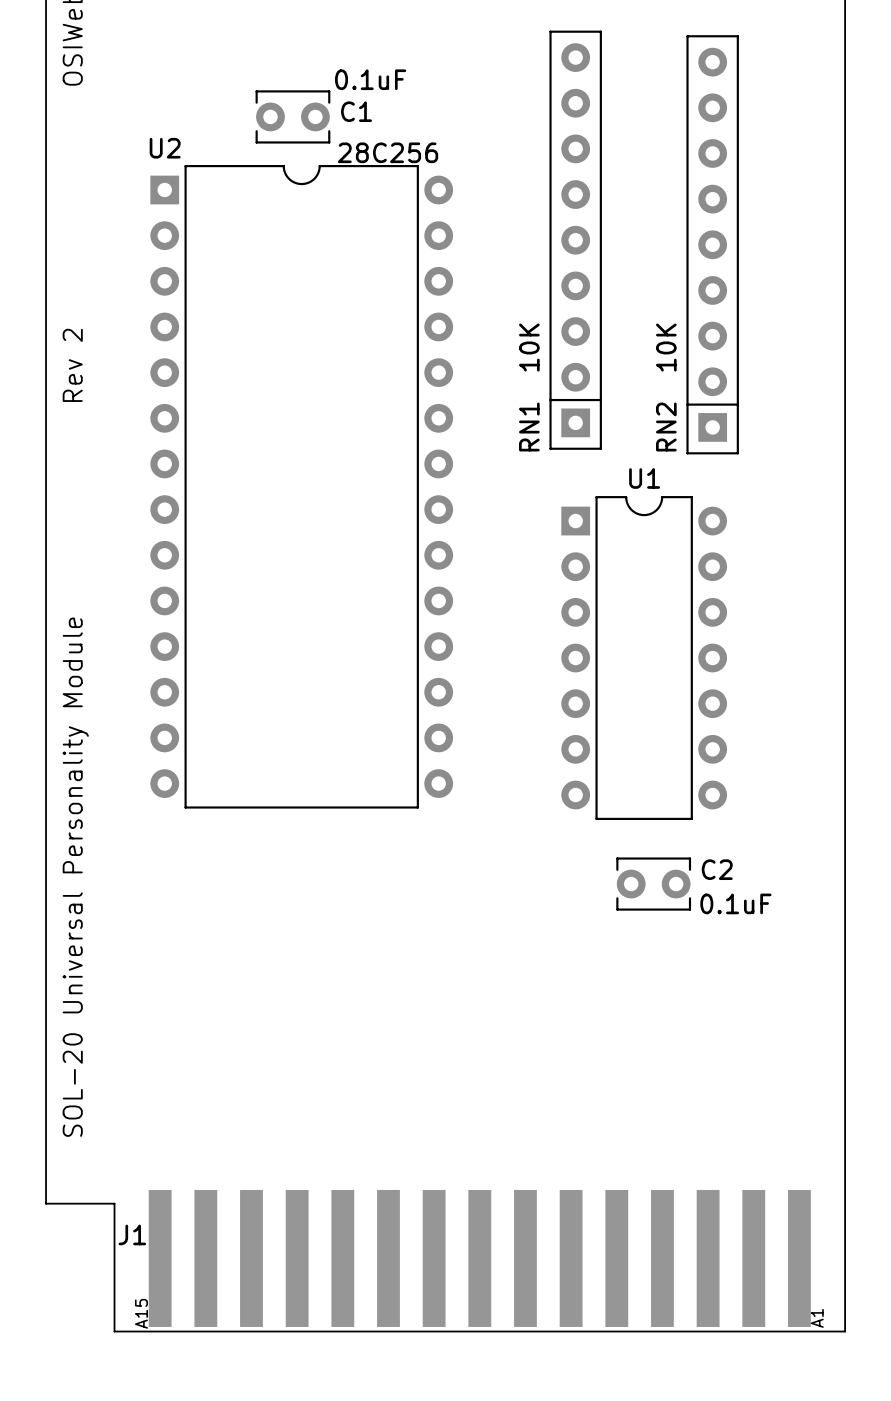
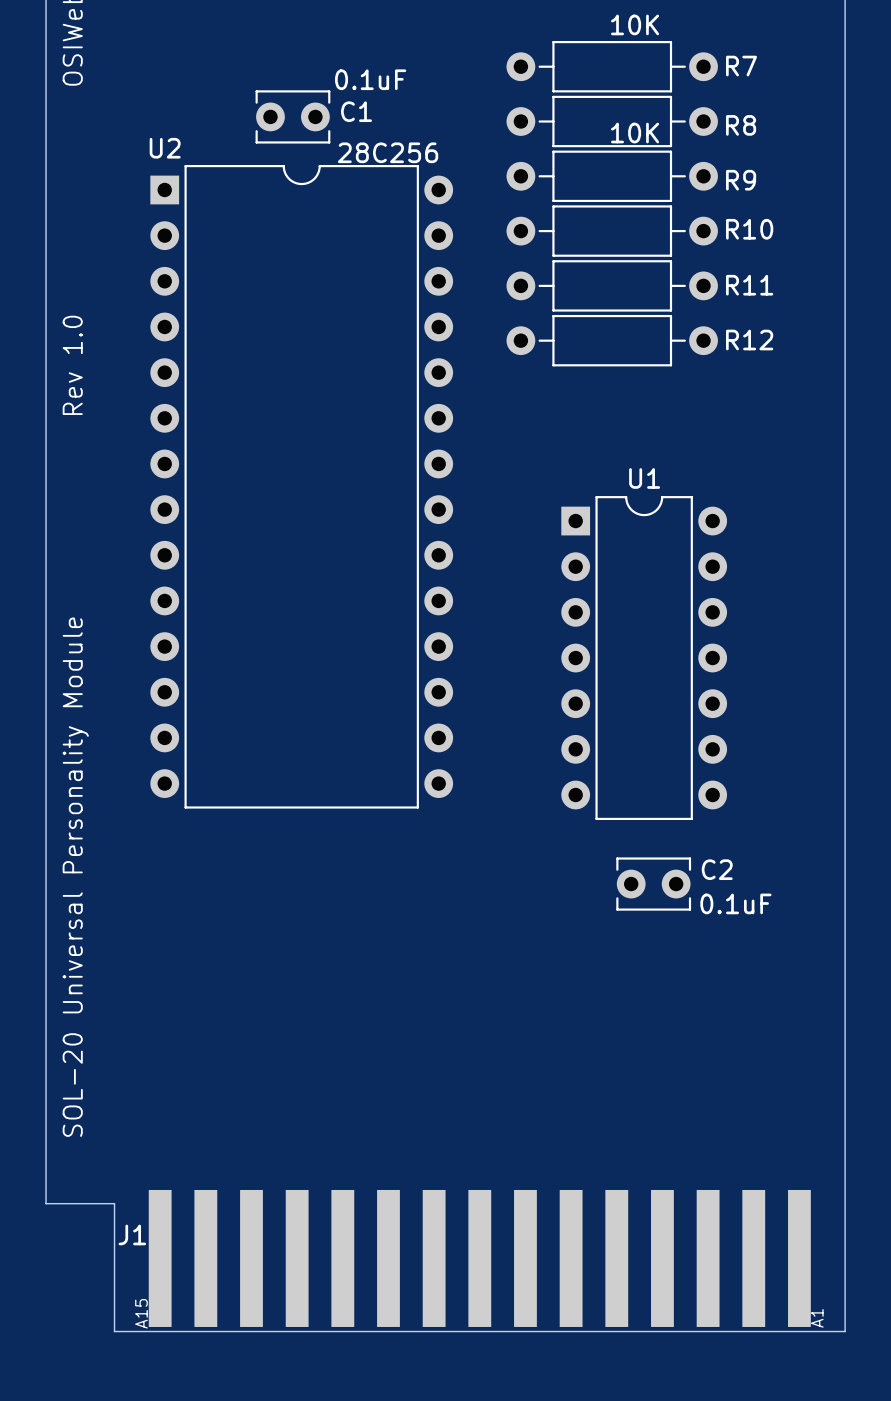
R7: none -> 10K (612, 66)
R8: none -> (612, 121)
R9: none -> 10K (612, 176)
R10: none -> (612, 231)
RN1: 10K (575, 240) -> none
RN2: 10K (712, 244) -> none
R11: none -> (612, 285)
R12: none -> (612, 340)
text: Rev 2 (72, 365) -> Rev 1.0 (72, 365)

